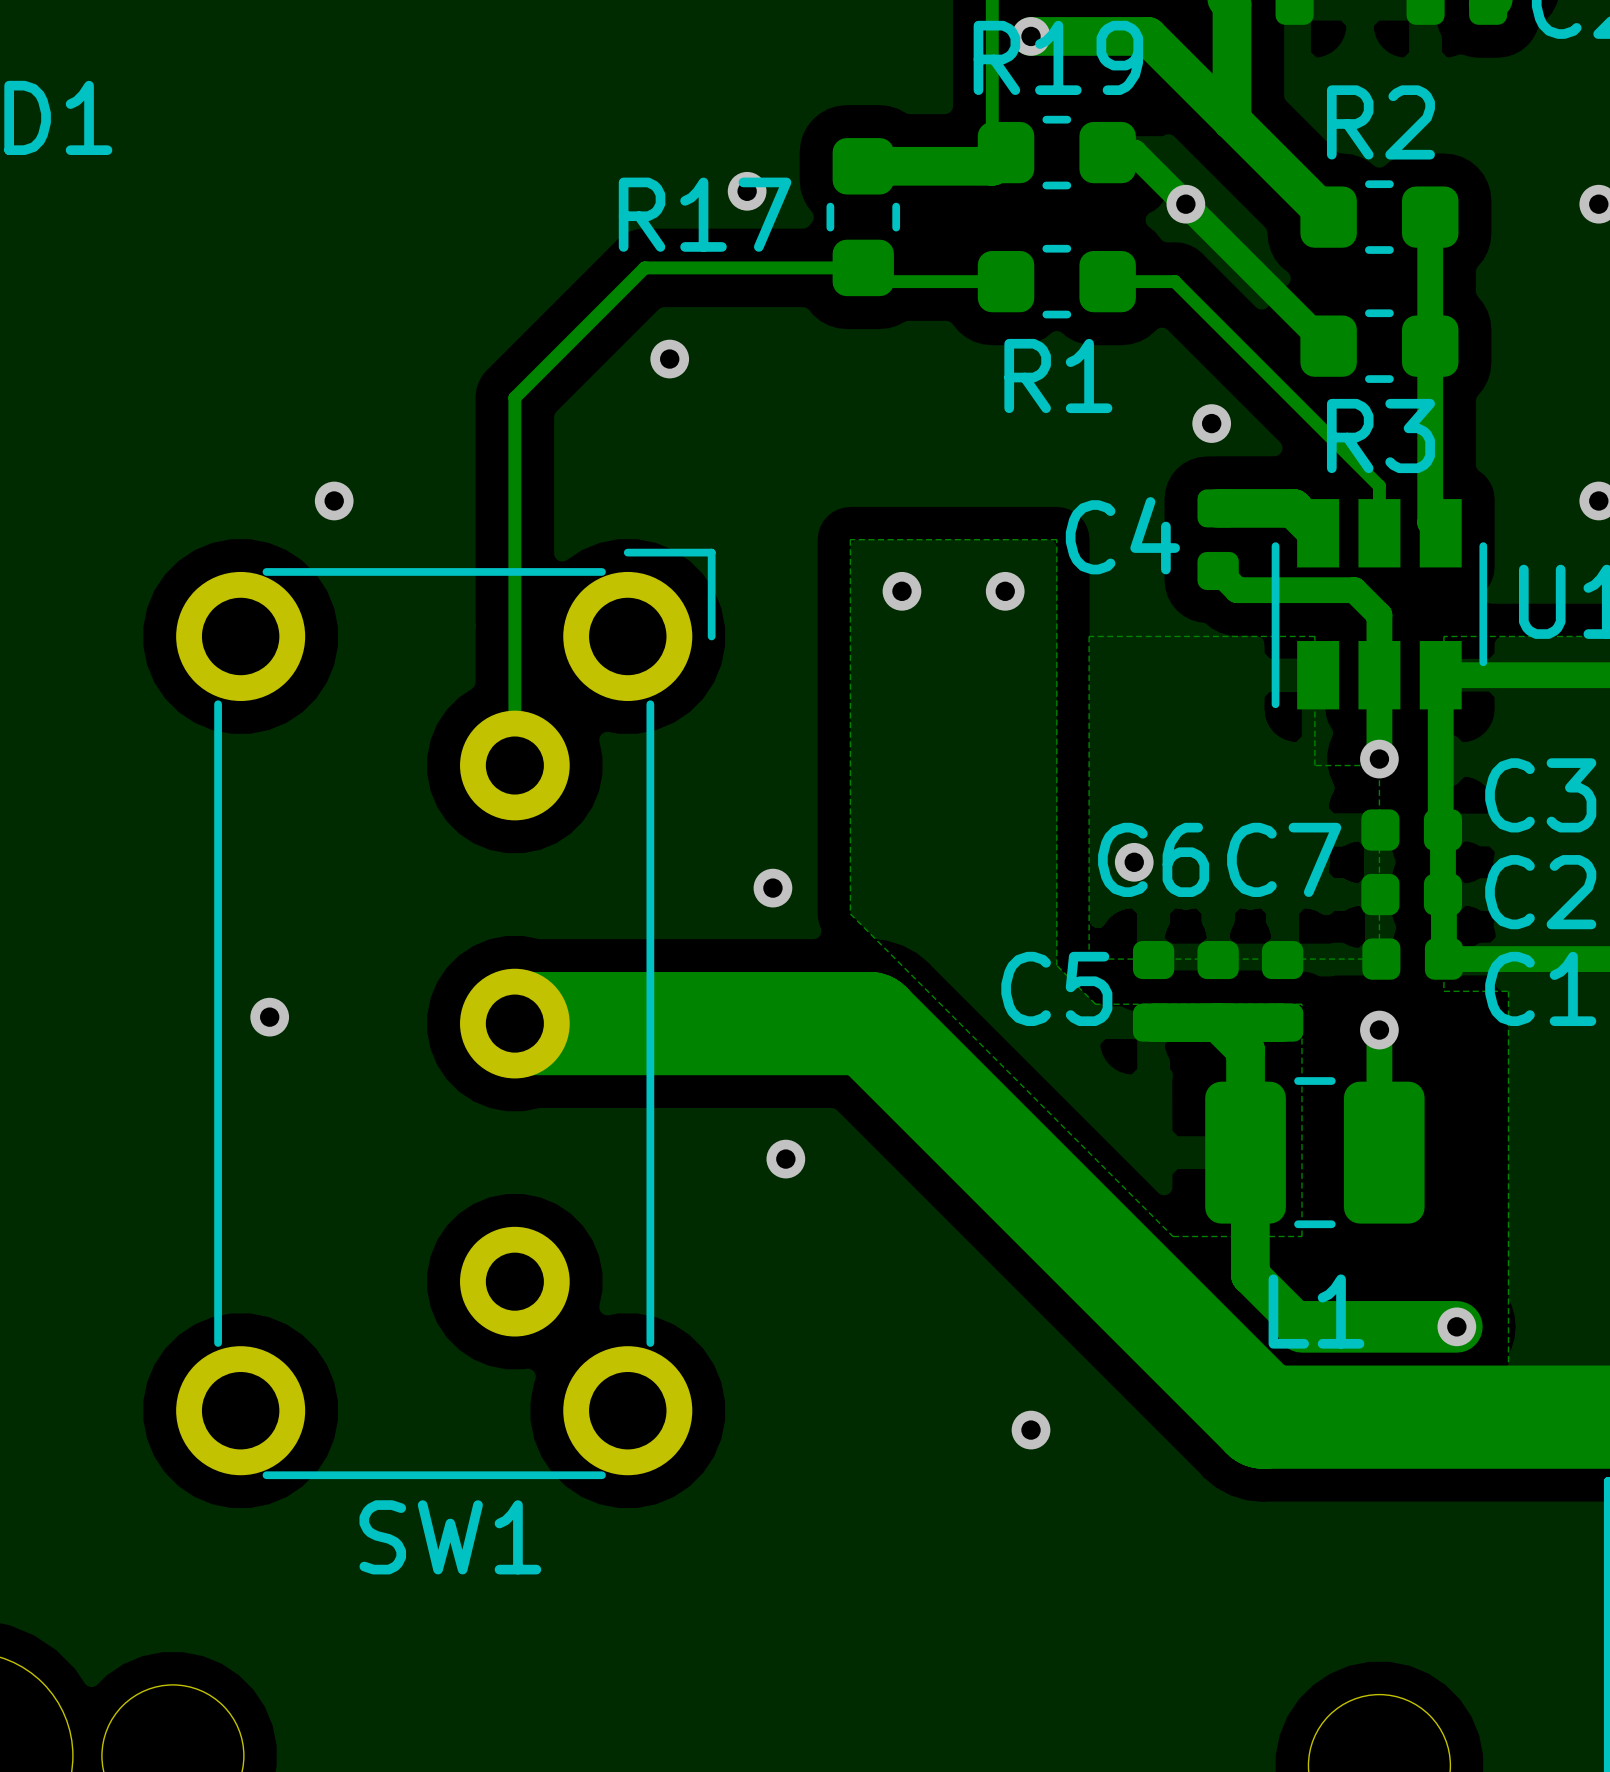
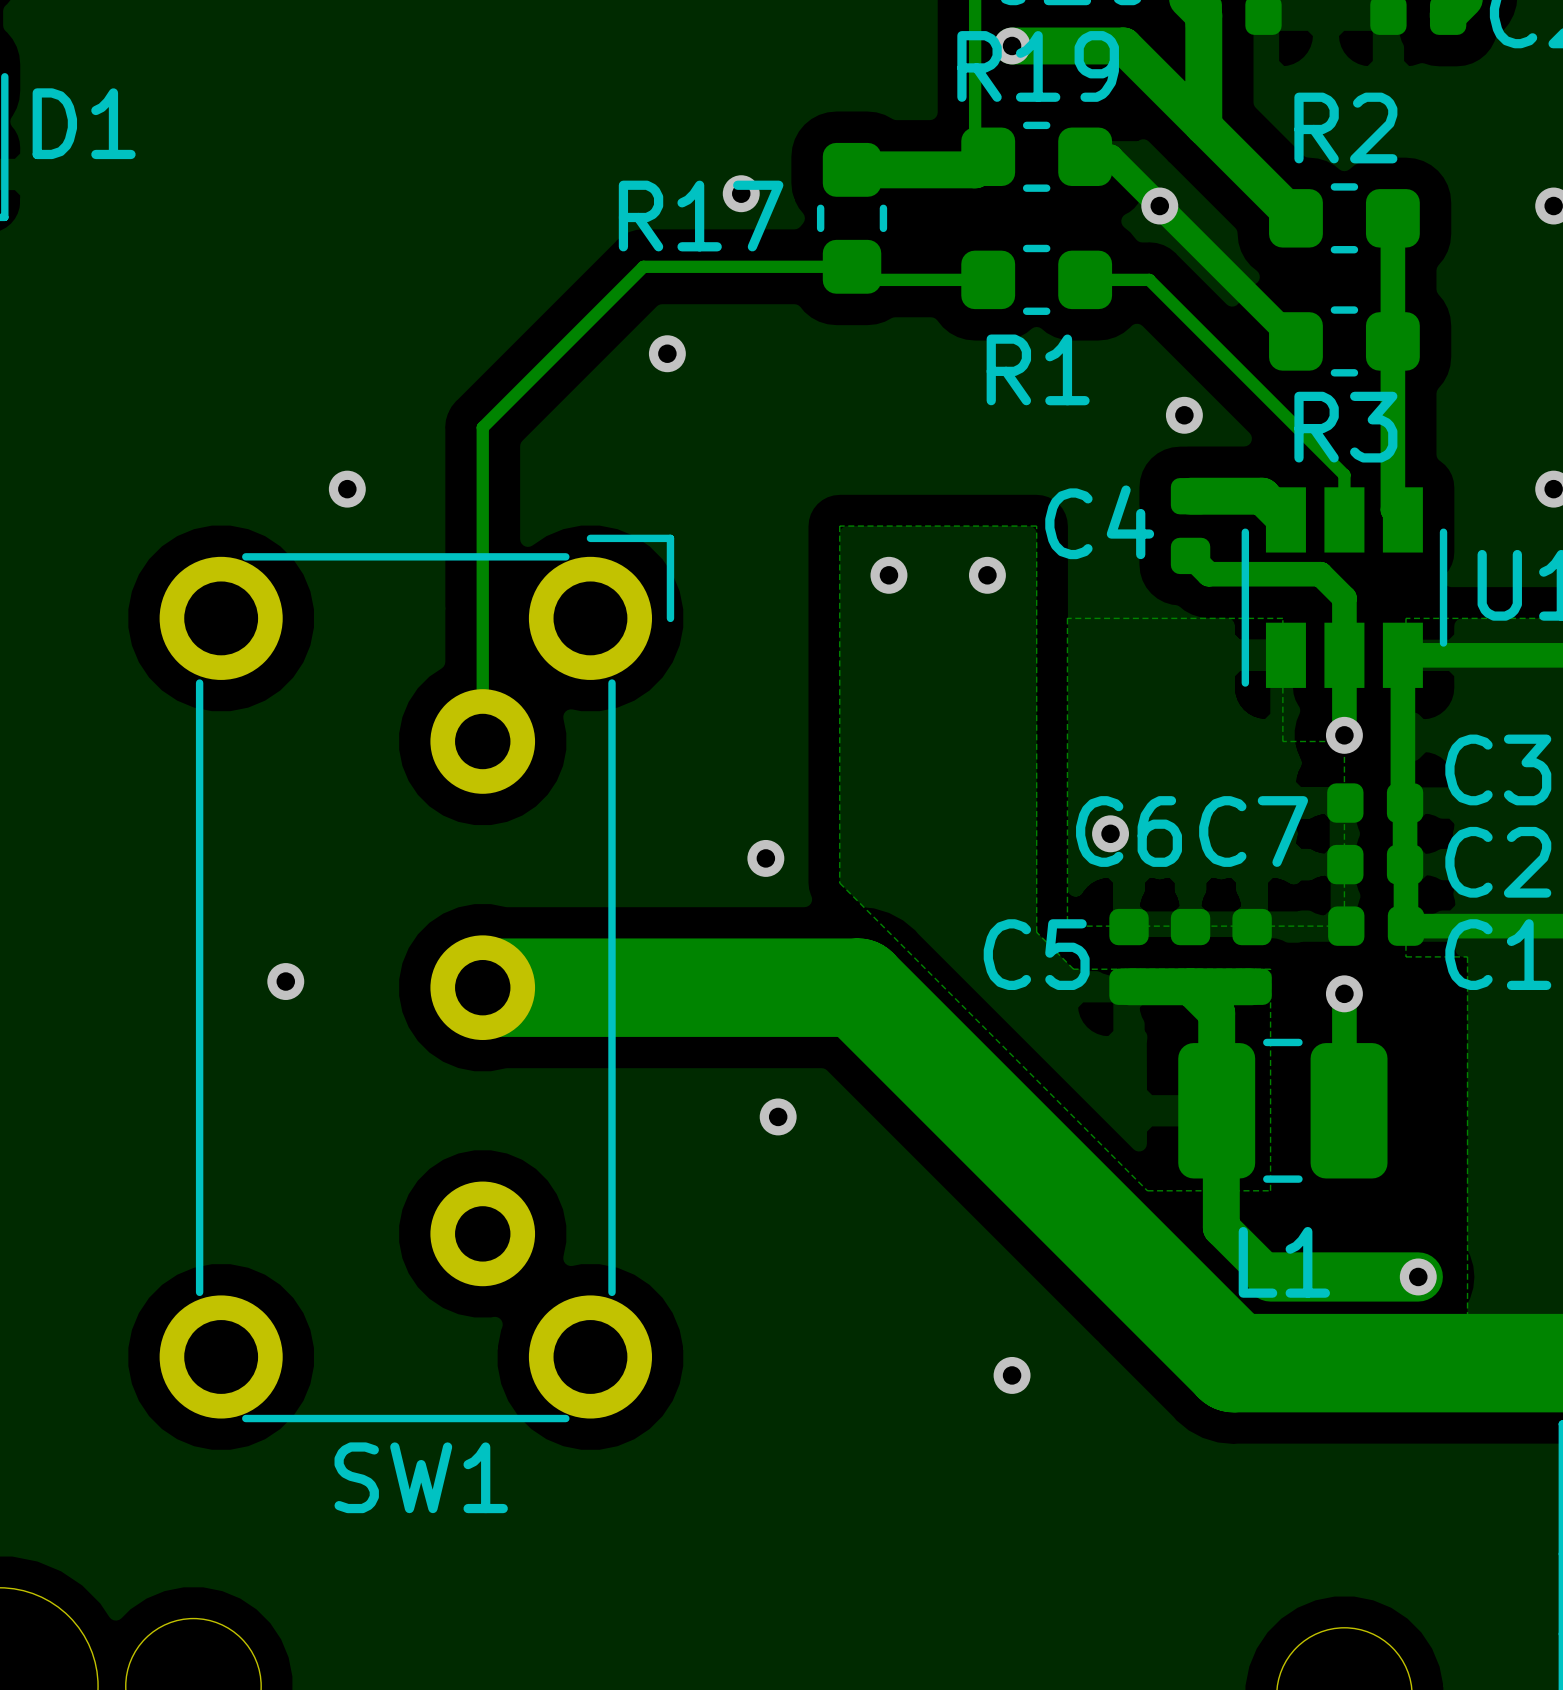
track: (514, 397) (514, 765) -> (519, 390) (482, 427) (482, 741)
SW1 position: (445, 1013) -> (416, 978)

